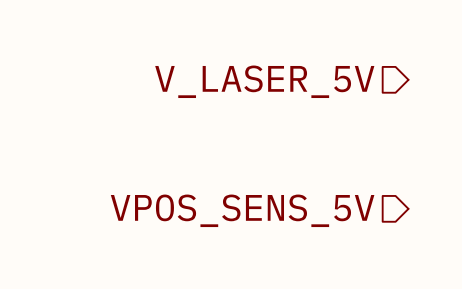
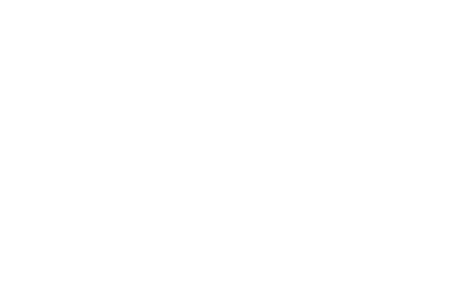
hierarchical label: V_LASER_5V (264, 81) -> none
hierarchical label: VPOS_SENS_5V (242, 210) -> none

